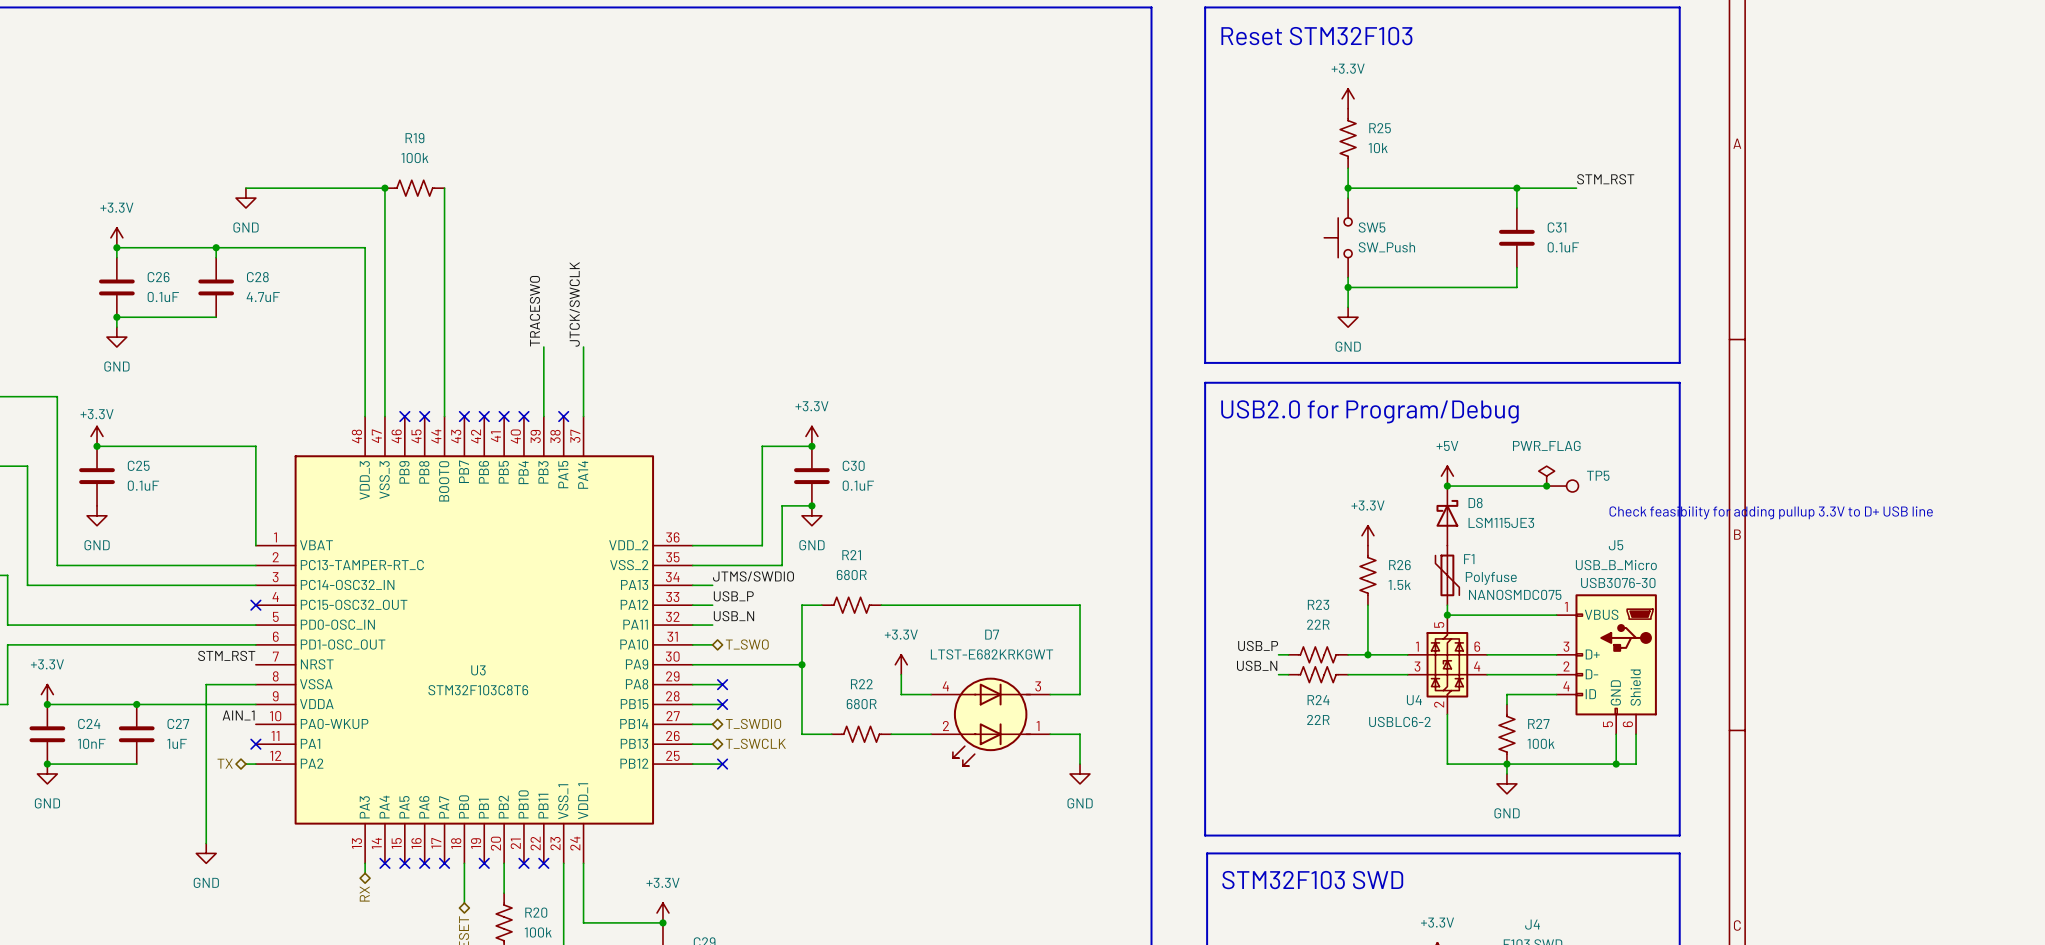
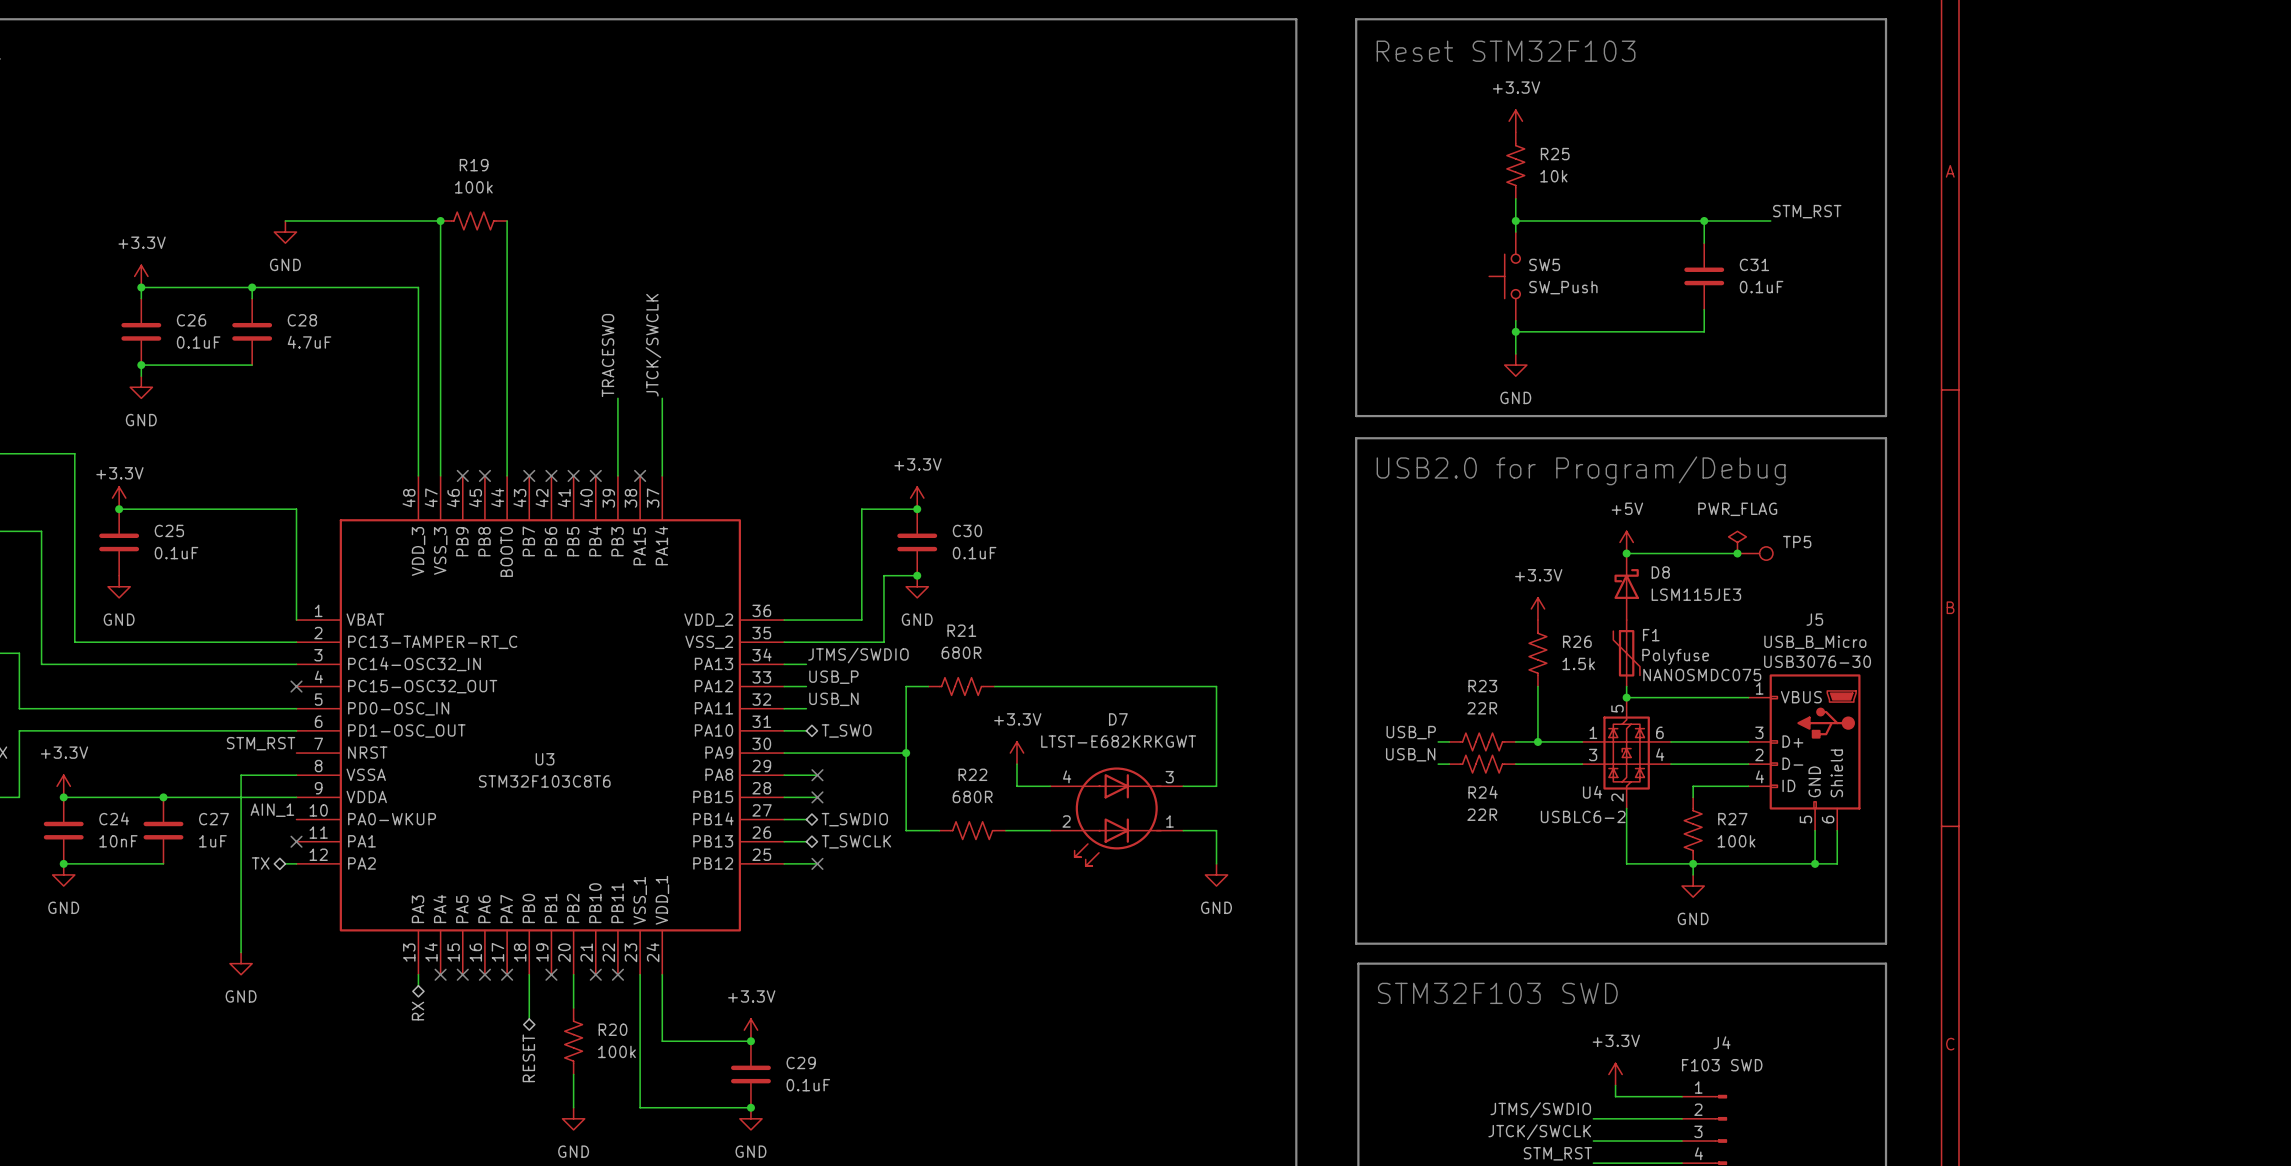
text: Check feasibility for adding pullup 3.3V to D+ USB line (1771, 512) -> none

